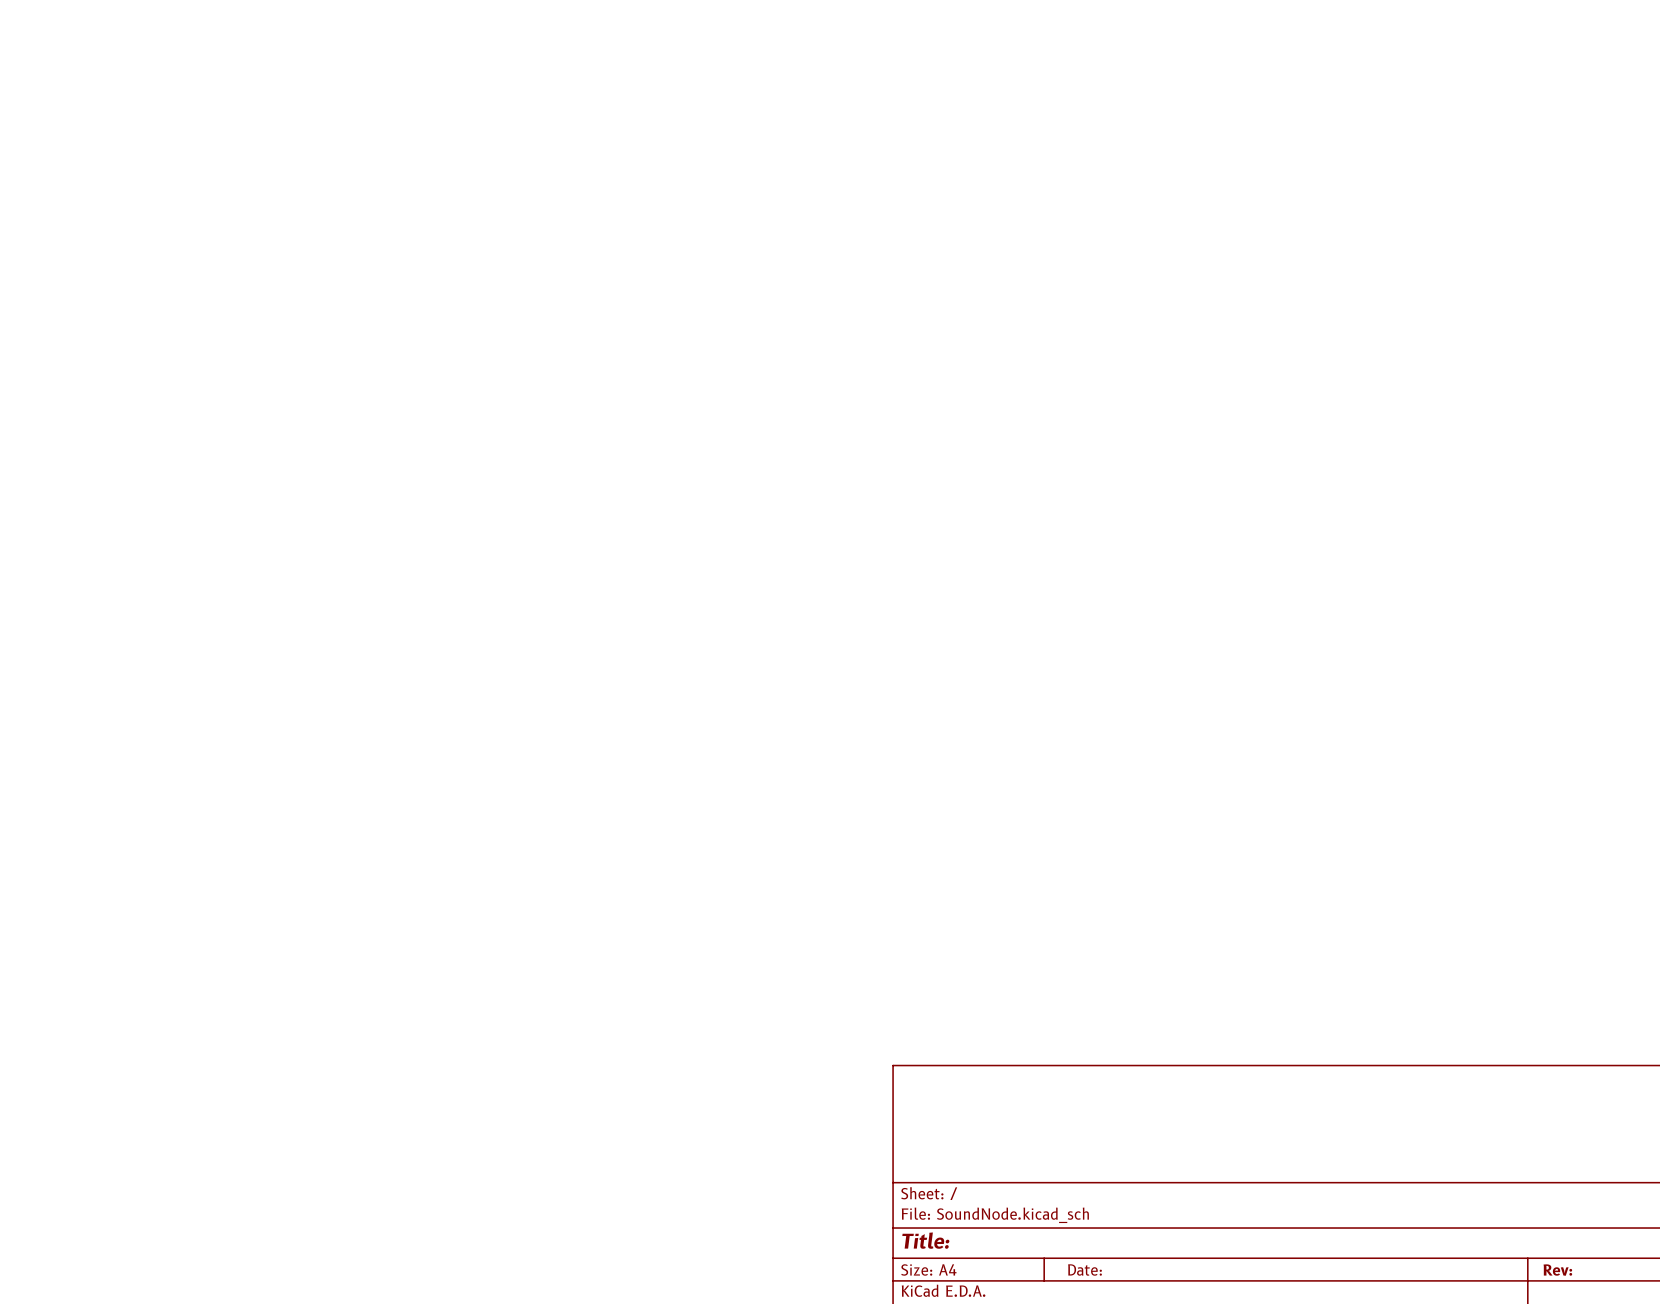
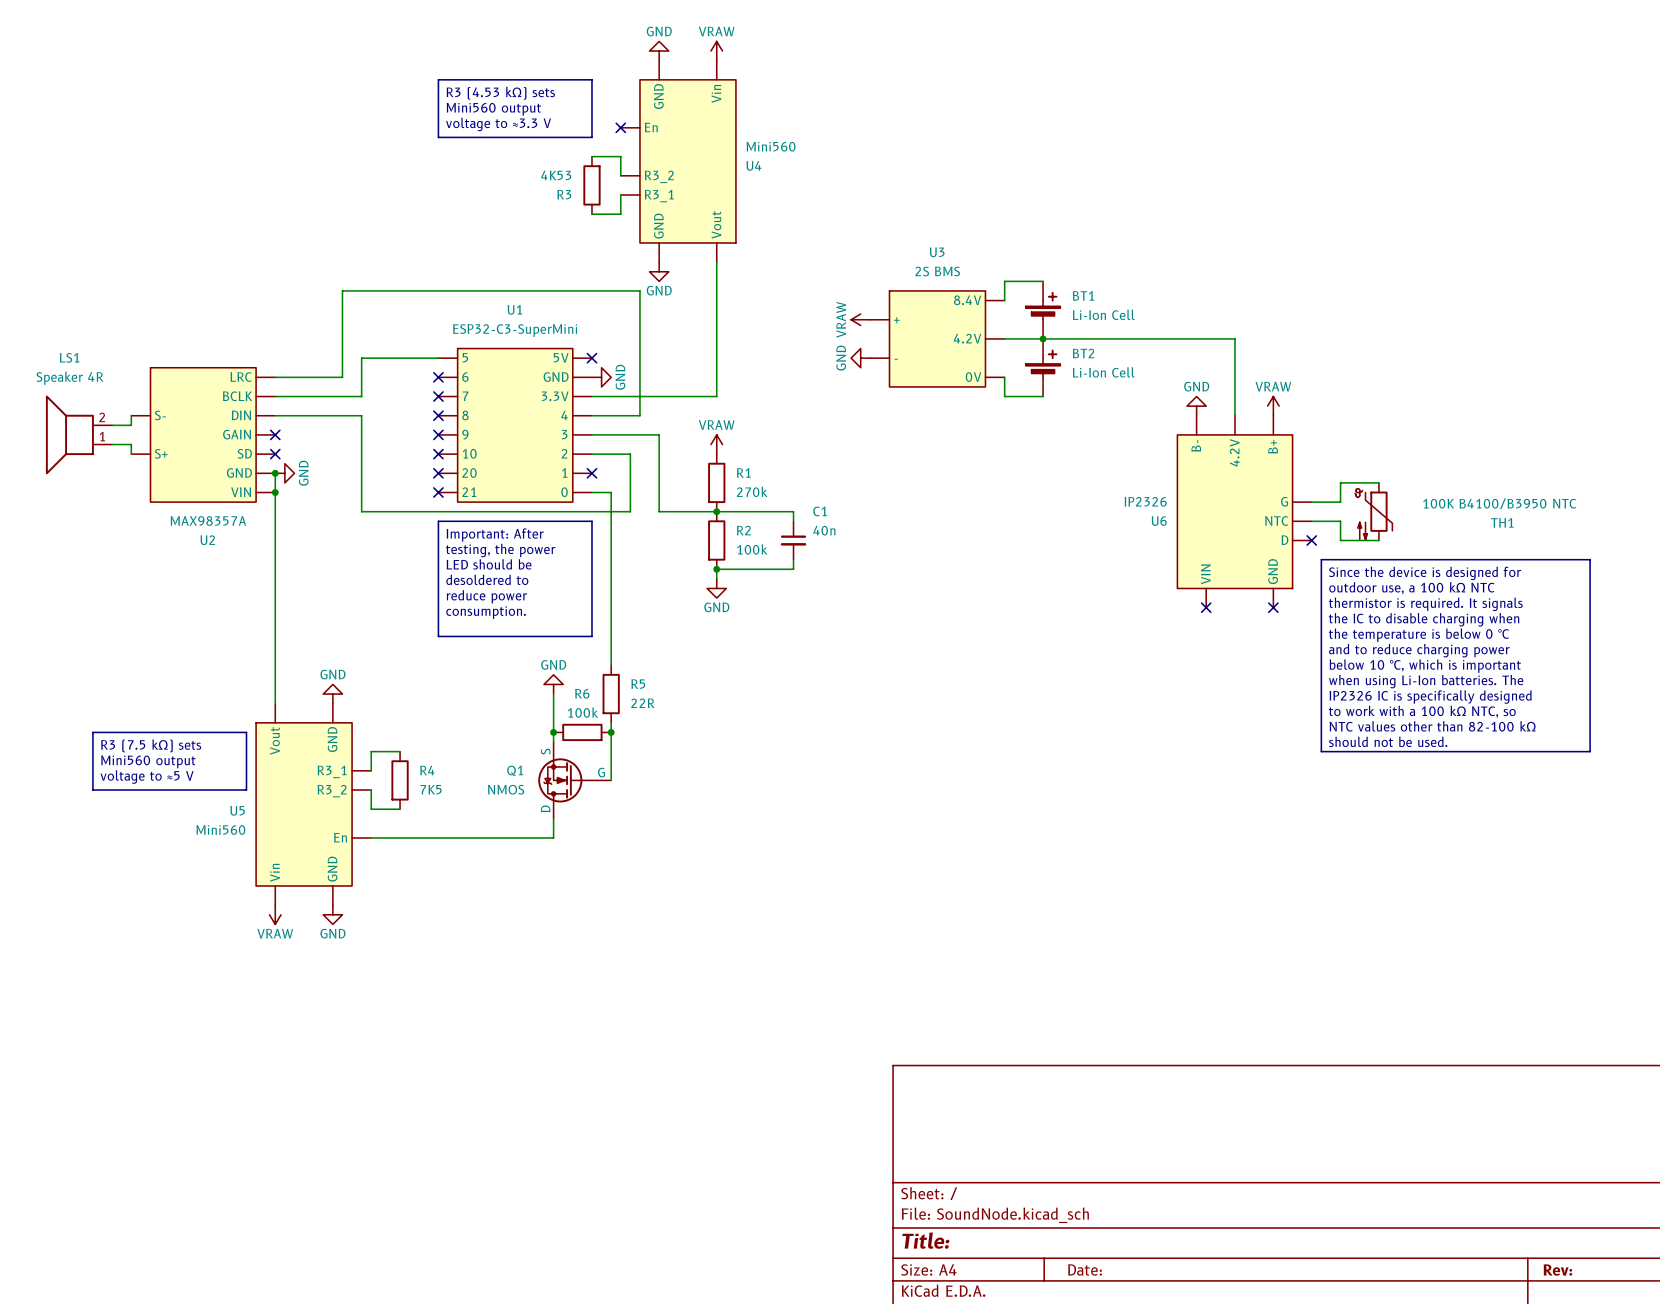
power symbol: none -> GND (659, 51)
power symbol: none -> VRAW (716, 51)
line: none -> (438, 79) (591, 79) (591, 137) (438, 137) (438, 79)
text: none -> R3 (4.53 kΩ) sets (500, 93)
text: none -> Mini560 output (493, 109)
text: none -> voltage to ≈3.3 V (498, 124)
no-connect mark: none -> (620, 127)
wire: none -> (591, 156) (620, 156) (620, 175)
U4: none -> Mini560 (678, 161)
R3: none -> 4K53 (591, 185)
wire: none -> (620, 195) (620, 214) (591, 214)
wire: none -> (716, 262) (716, 396) (591, 396)
power symbol: none -> GND (659, 271)
wire: none -> (1043, 281) (1004, 281) (1004, 300)
BT1: none -> Li-Ion Cell (1043, 310)
power symbol: none -> VRAW (860, 319)
U3: none -> 2S BMS (937, 338)
wire: none -> (1004, 338) (1234, 338) (1234, 415)
junction: none -> (1043, 338)
wire: none -> (438, 358) (361, 358) (361, 396) (275, 396)
no-connect mark: none -> (591, 358)
power symbol: none -> GND (860, 358)
BT2: none -> Li-Ion Cell (1043, 367)
wire: none -> (275, 377) (342, 377) (342, 290) (639, 290) (639, 415) (591, 415)
no-connect mark: none -> (438, 377)
power symbol: none -> GND (601, 377)
wire: none -> (1004, 377) (1004, 396) (1043, 396)
no-connect mark: none -> (438, 396)
power symbol: none -> GND (1196, 406)
power symbol: none -> VRAW (1273, 406)
wire: none -> (131, 415) (131, 425) (112, 425)
wire: none -> (275, 415) (361, 415) (361, 511) (630, 511) (630, 454) (591, 454)
no-connect mark: none -> (438, 415)
U1: none -> ESP32-C3-SuperMini (515, 425)
LS1: none -> Speaker 4R (79, 434)
U2: none -> MAX98357A (203, 434)
no-connect mark: none -> (275, 434)
no-connect mark: none -> (438, 434)
wire: none -> (591, 434) (659, 434) (659, 511) (793, 511) (793, 521)
wire: none -> (112, 444) (131, 444) (131, 454)
power symbol: none -> VRAW (716, 444)
no-connect mark: none -> (275, 454)
no-connect mark: none -> (438, 454)
wire: none -> (275, 473) (275, 703)
junction: none -> (275, 473)
power symbol: none -> GND (284, 473)
no-connect mark: none -> (438, 473)
no-connect mark: none -> (591, 473)
R1: none -> 270k (716, 482)
wire: none -> (1378, 482) (1340, 482) (1340, 502) (1311, 502)
junction: none -> (275, 492)
no-connect mark: none -> (438, 492)
wire: none -> (591, 492) (611, 492) (611, 665)
junction: none -> (716, 511)
U6: none -> IP2326 (1244, 511)
TH1: none -> 100K B4100/B3950 NTC (1373, 511)
line: none -> (438, 521) (438, 636) (591, 636) (591, 521) (438, 521)
wire: none -> (1311, 521) (1340, 521) (1340, 540) (1378, 540)
text: none -> Important: After (495, 535)
R2: none -> 100k (716, 540)
C1: none -> 40n (793, 540)
no-connect mark: none -> (1311, 540)
text: none -> testing, the power (500, 550)
wire: none -> (793, 559) (793, 569) (716, 569) (716, 578)
line: none -> (1321, 559) (1590, 559) (1590, 751) (1321, 751) (1321, 559)
text: none -> LED should be (489, 564)
junction: none -> (716, 569)
text: none -> Since the device is designed for (1425, 573)
text: none -> desoldered to (487, 579)
power symbol: none -> GND (716, 588)
text: none -> outdoor use, a 100 kΩ NTC (1411, 588)
text: none -> reduce power (486, 596)
text: none -> thermistor is required. It signals (1425, 604)
no-connect mark: none -> (1206, 607)
no-connect mark: none -> (1273, 607)
text: none -> consumption. (486, 612)
text: none -> the IC to disable charging when (1424, 619)
text: none -> the temperature is below 0 °C (1418, 635)
text: none -> and to reduce charging power (1419, 650)
text: none -> below 10 °C, which is important (1425, 666)
text: none -> when using Li-Ion batteries. The (1426, 681)
power symbol: none -> GND (553, 684)
power symbol: none -> GND (332, 694)
wire: none -> (553, 694) (553, 742)
R5: none -> 22R (611, 694)
text: none -> IP2326 IC is specifically designed (1430, 697)
text: none -> to work with a 100 kΩ NTC, so (1422, 711)
wire: none -> (611, 722) (611, 780)
text: none -> NTC values other than 82-100 kΩ (1432, 726)
line: none -> (92, 732) (246, 732) (246, 790) (92, 790) (92, 732)
junction: none -> (553, 732)
R6: none -> 100k (582, 732)
junction: none -> (611, 732)
text: none -> should not be used. (1388, 741)
text: none -> R3 (7.5 kΩ) sets (151, 745)
wire: none -> (400, 751) (371, 751) (371, 770)
text: none -> Mini560 output (148, 761)
text: none -> voltage to ≈5 V (147, 777)
R4: none -> 7K5 (400, 780)
Q1: none -> NMOS (574, 780)
wire: none -> (371, 790) (371, 809) (400, 809)
U5: none -> Mini560 (313, 804)
wire: none -> (553, 818) (553, 838) (371, 838)
power symbol: none -> VRAW (275, 914)
power symbol: none -> GND (332, 914)

